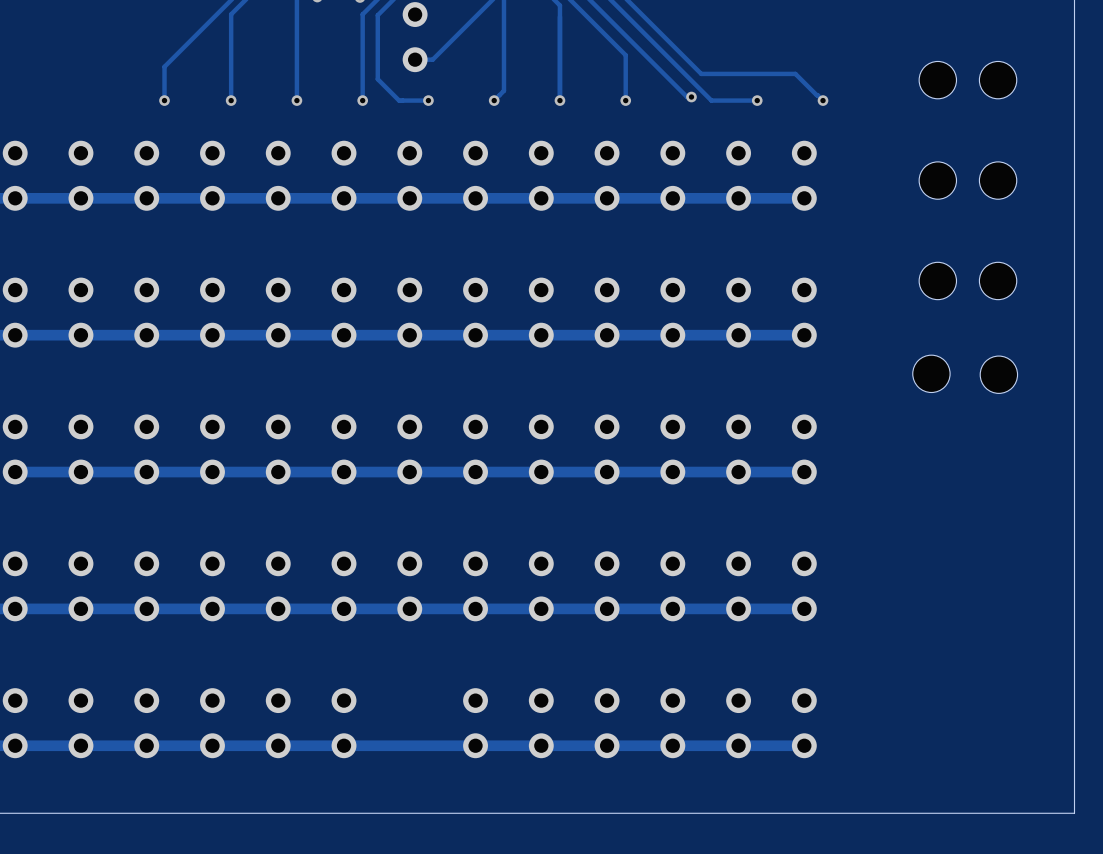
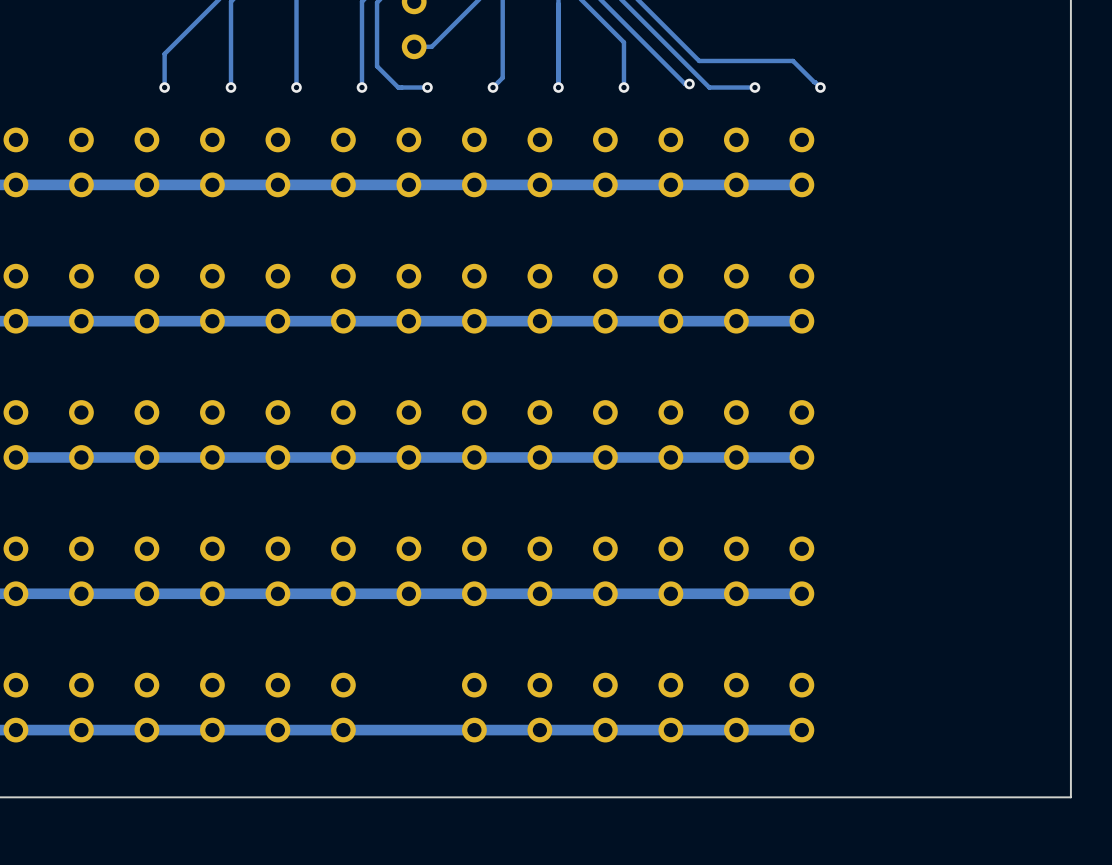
part: (937, 80) -> none
part: (998, 80) -> none
part: (937, 180) -> none
part: (998, 180) -> none
part: (937, 280) -> none
part: (998, 280) -> none
part: (931, 373) -> none
part: (998, 374) -> none

